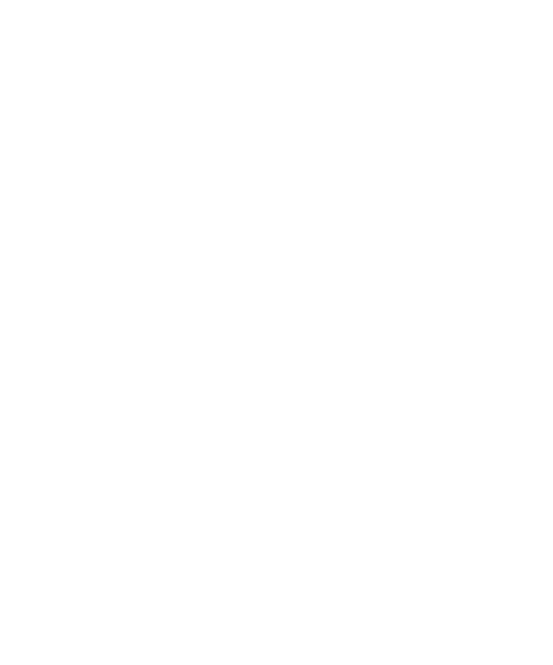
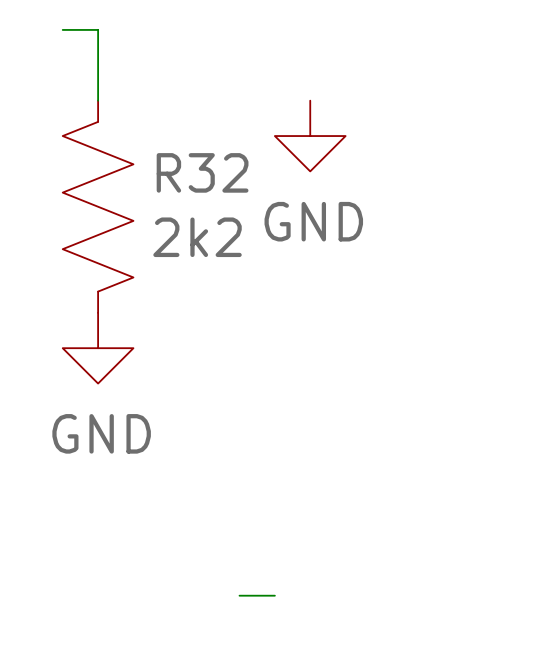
wire: none -> (62, 29) (98, 29) (98, 100)
power symbol: none -> GND (310, 136)
R32: none -> 2k2 (98, 206)
power symbol: none -> GND (98, 348)
wire: none -> (239, 595) (274, 595)

